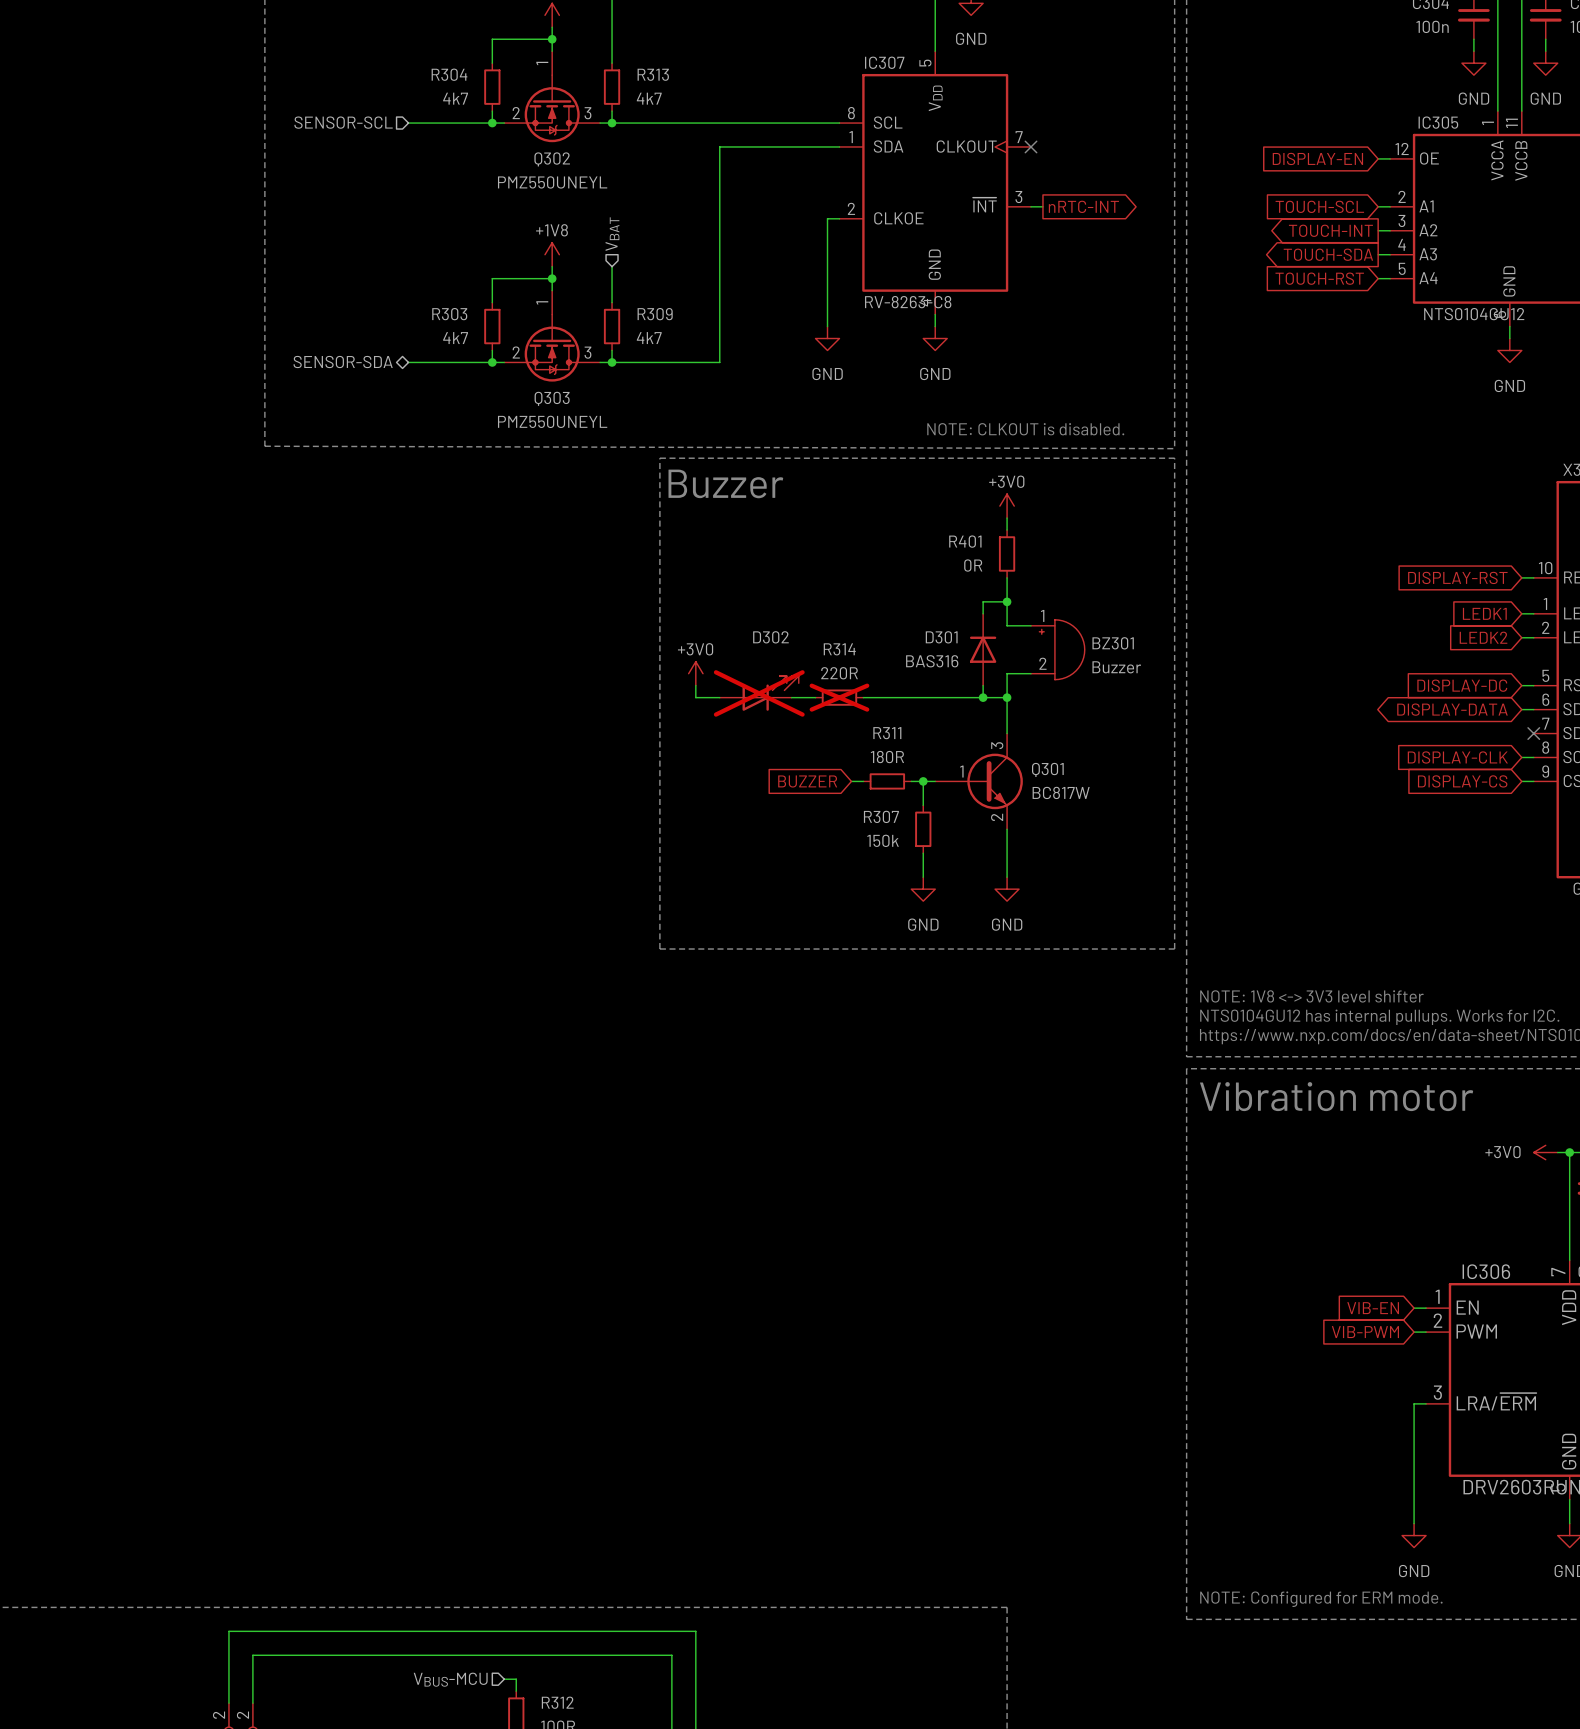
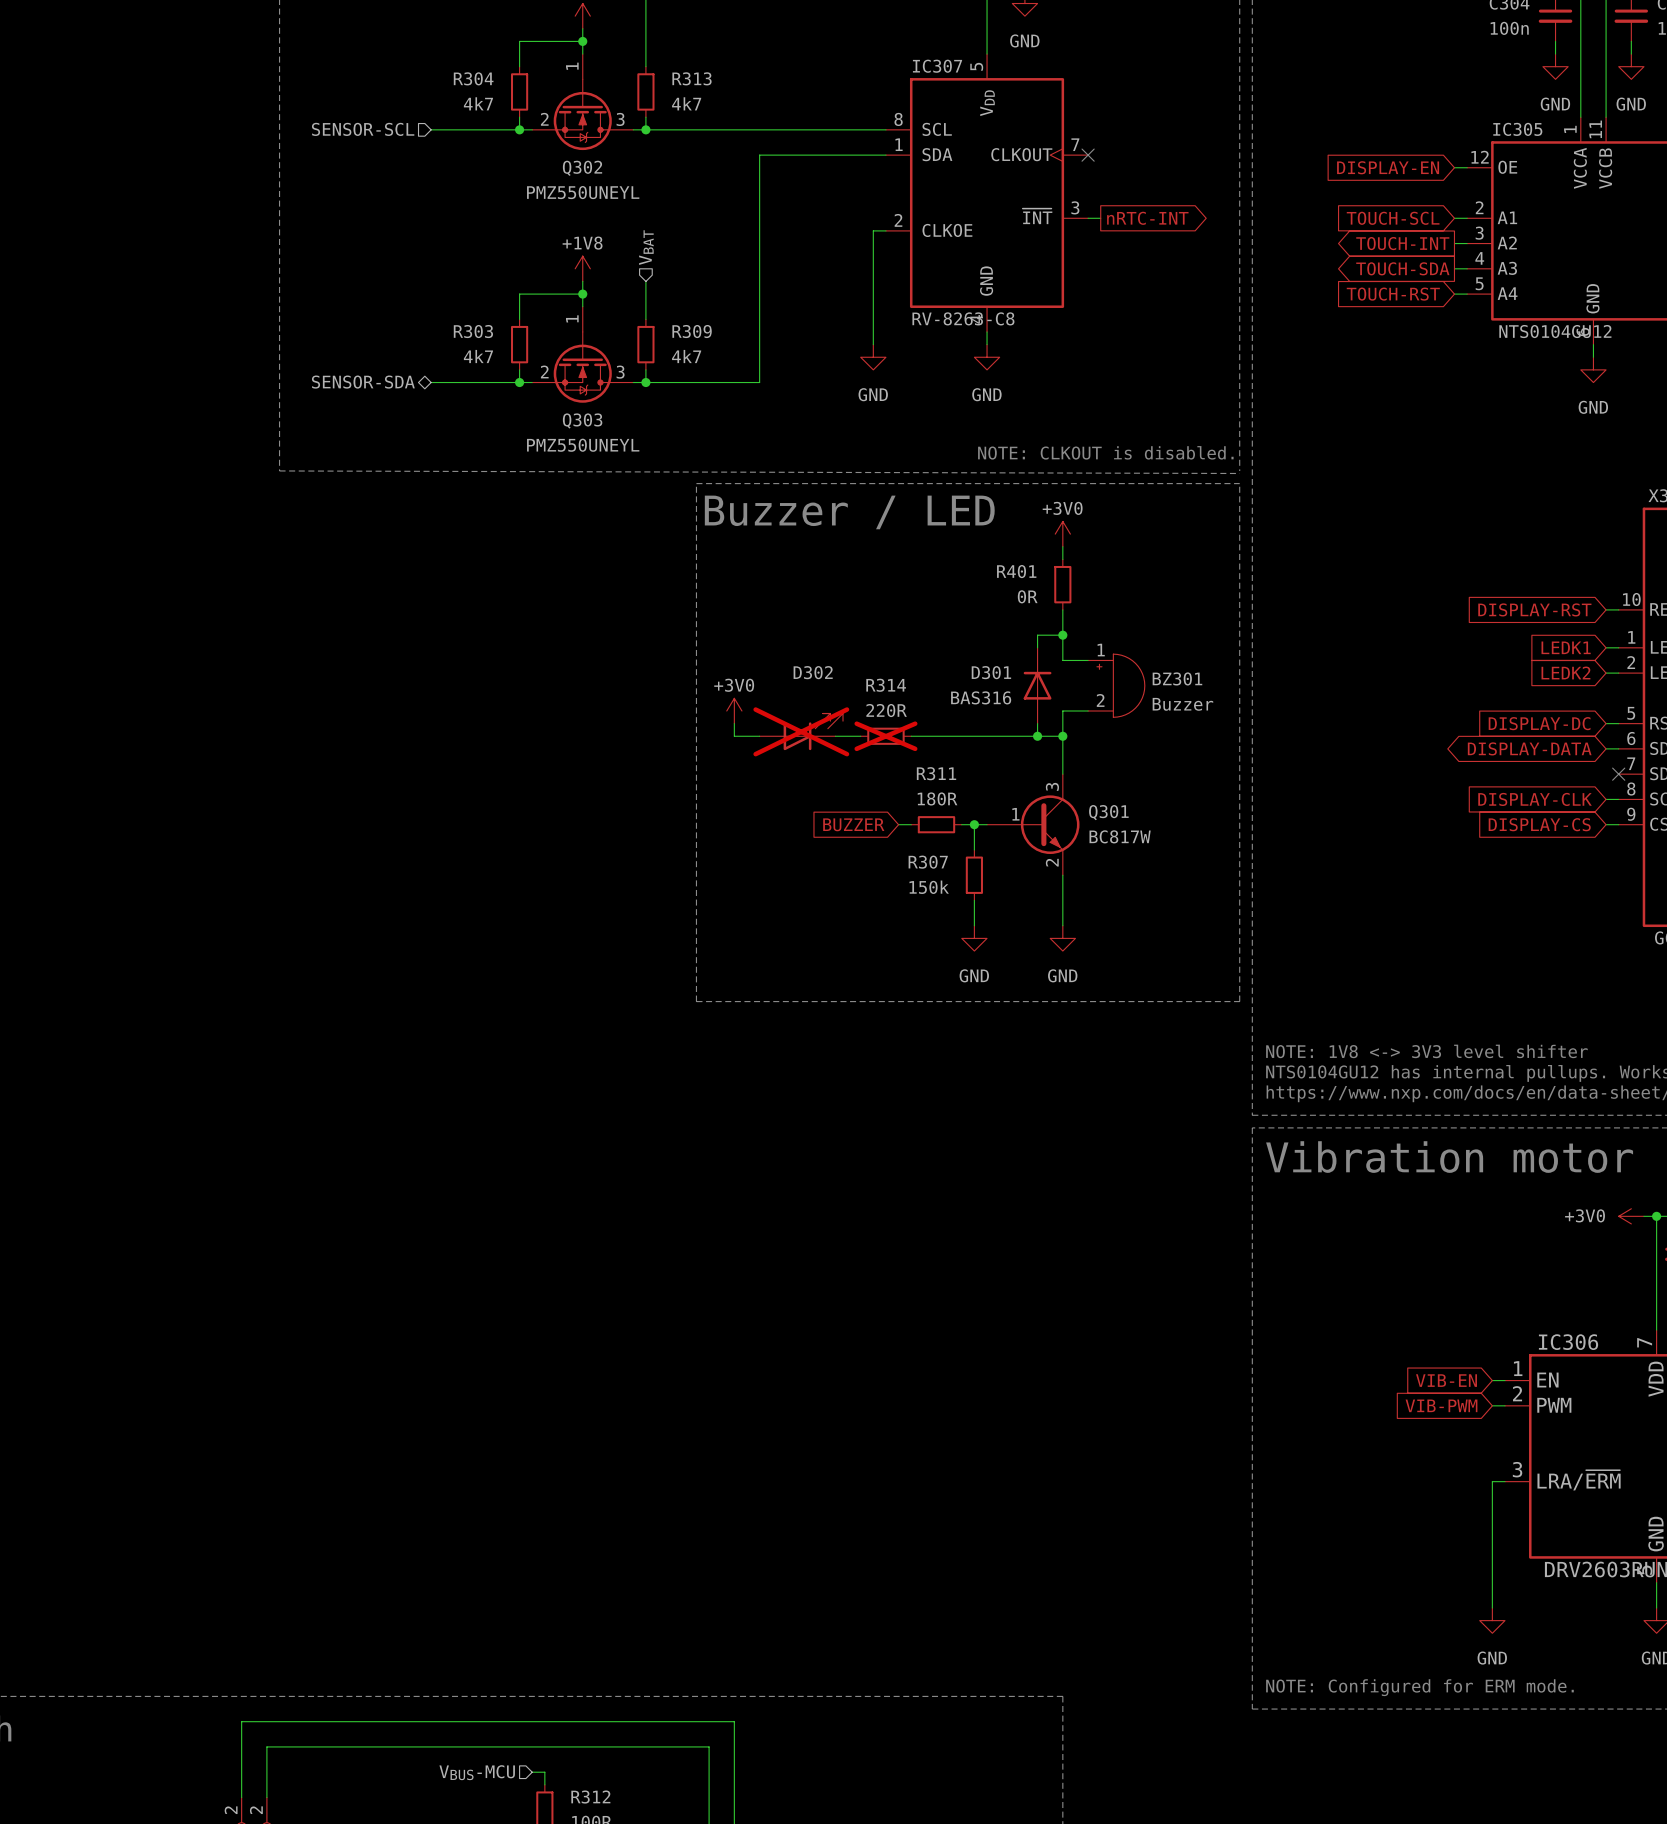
text: Buzzer (725, 483) -> Buzzer / LED (849, 512)

